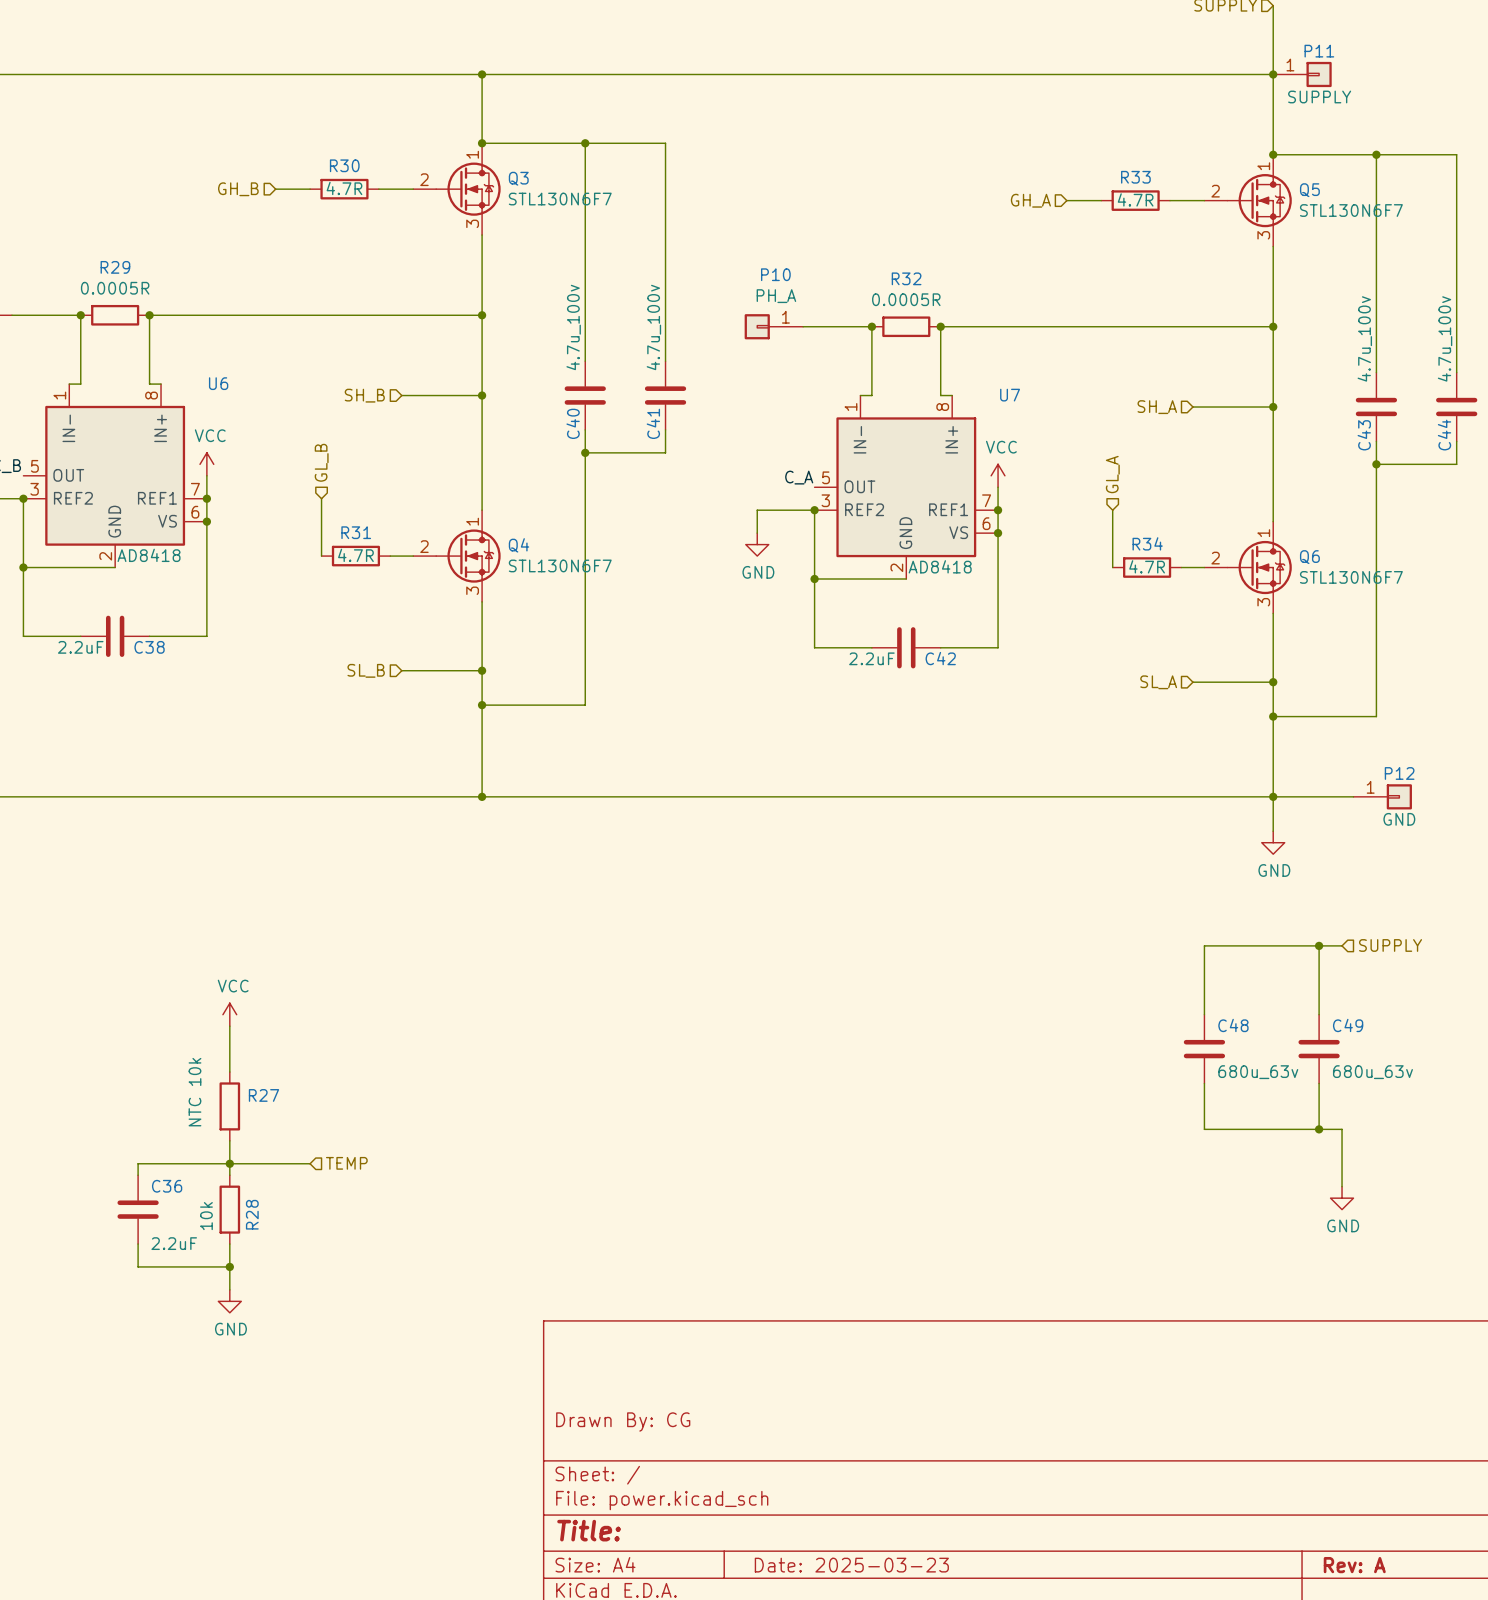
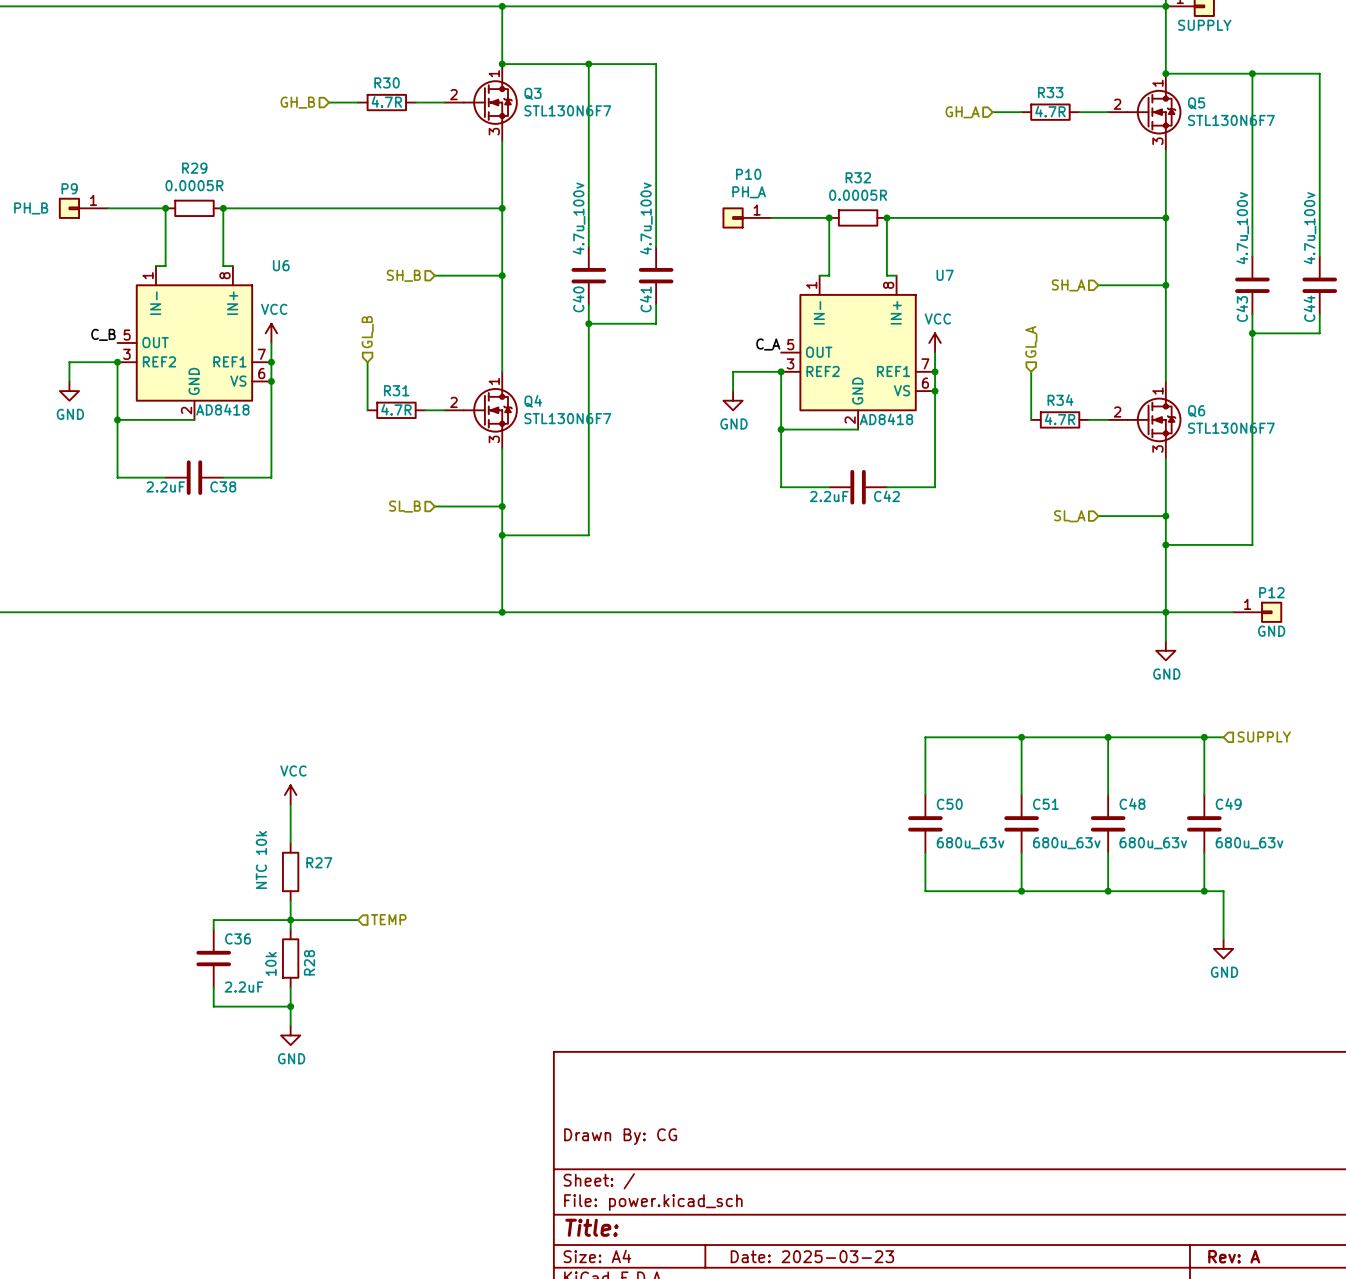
wire: none -> (1021, 737) (1021, 795)
junction: none -> (1021, 737)
wire: none -> (1108, 737) (925, 737) (925, 795)
junction: none -> (1108, 737)
C50: none -> 680u_63v (925, 823)
C51: none -> 680u_63v (1021, 823)
wire: none -> (925, 852) (925, 891) (1108, 891)
wire: none -> (1021, 852) (1021, 891)
junction: none -> (1021, 891)
junction: none -> (1108, 891)

